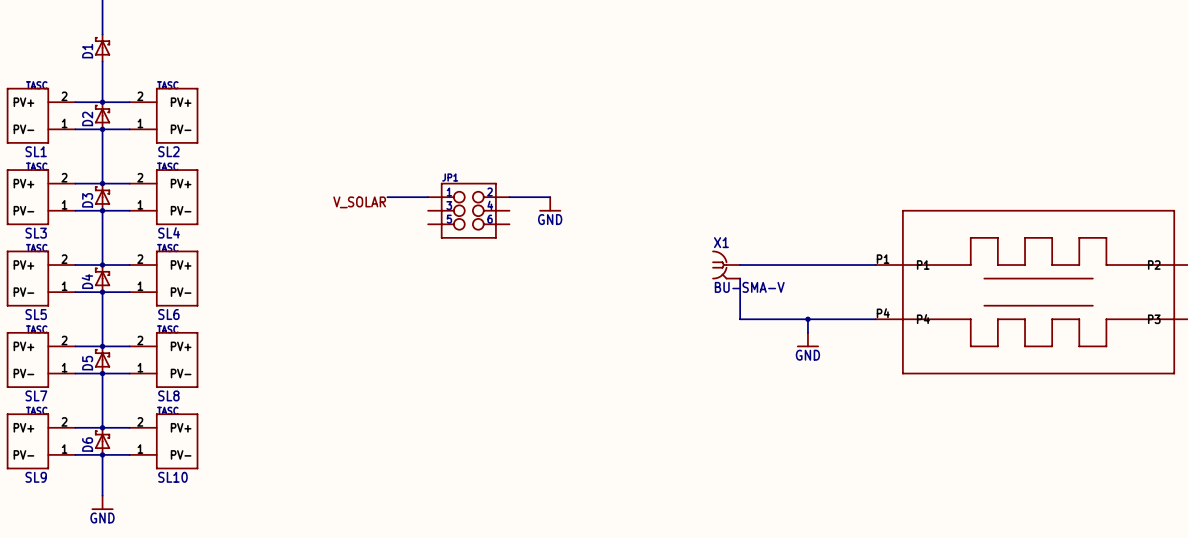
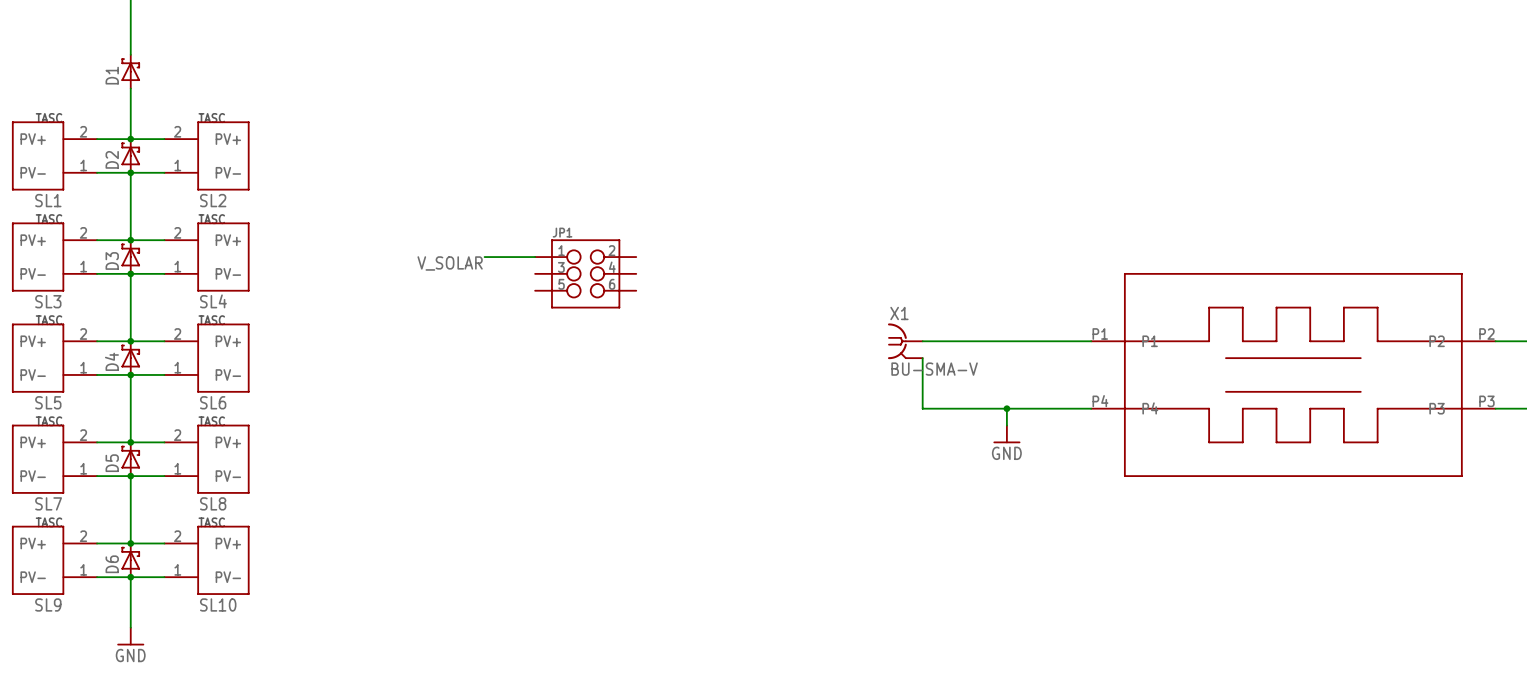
wire: (509, 197) (550, 197) -> none
power symbol: GND (550, 204) -> none

